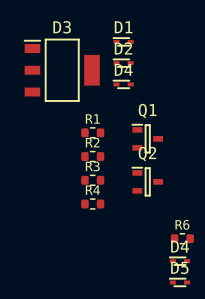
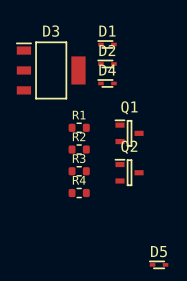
R6: (182, 238) -> none
D4: (179, 261) -> none

